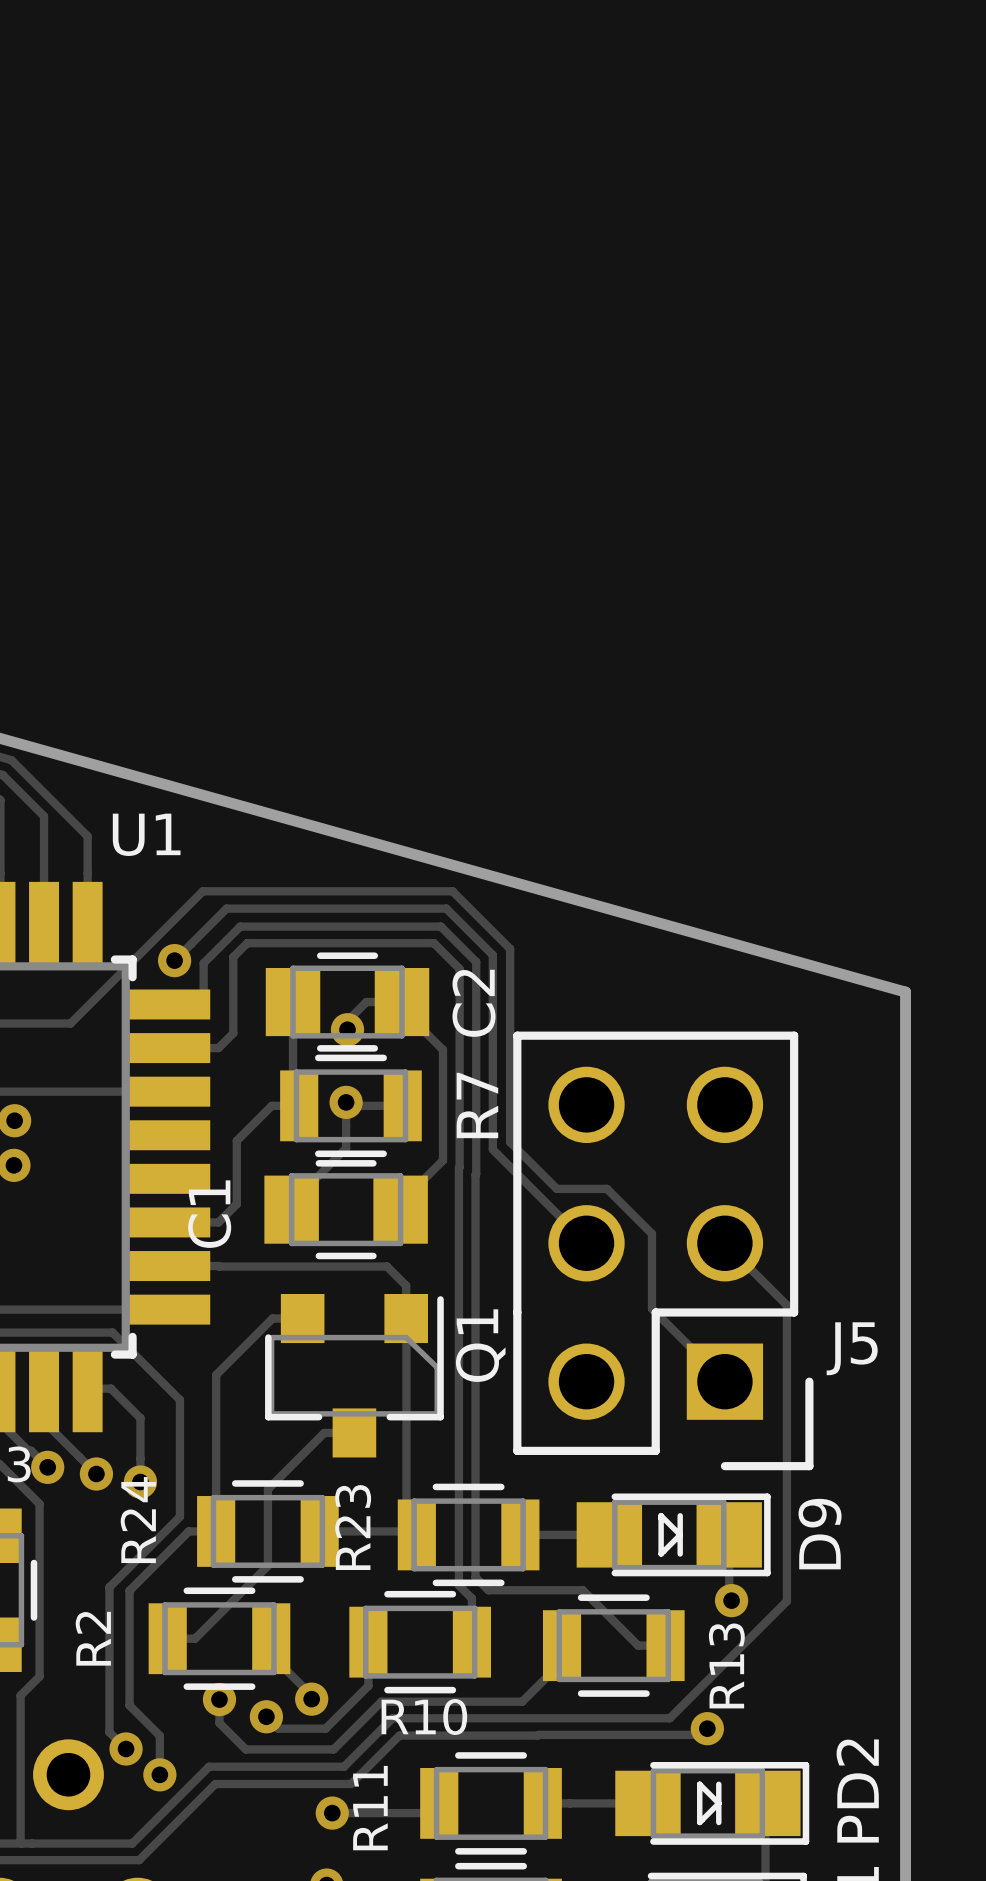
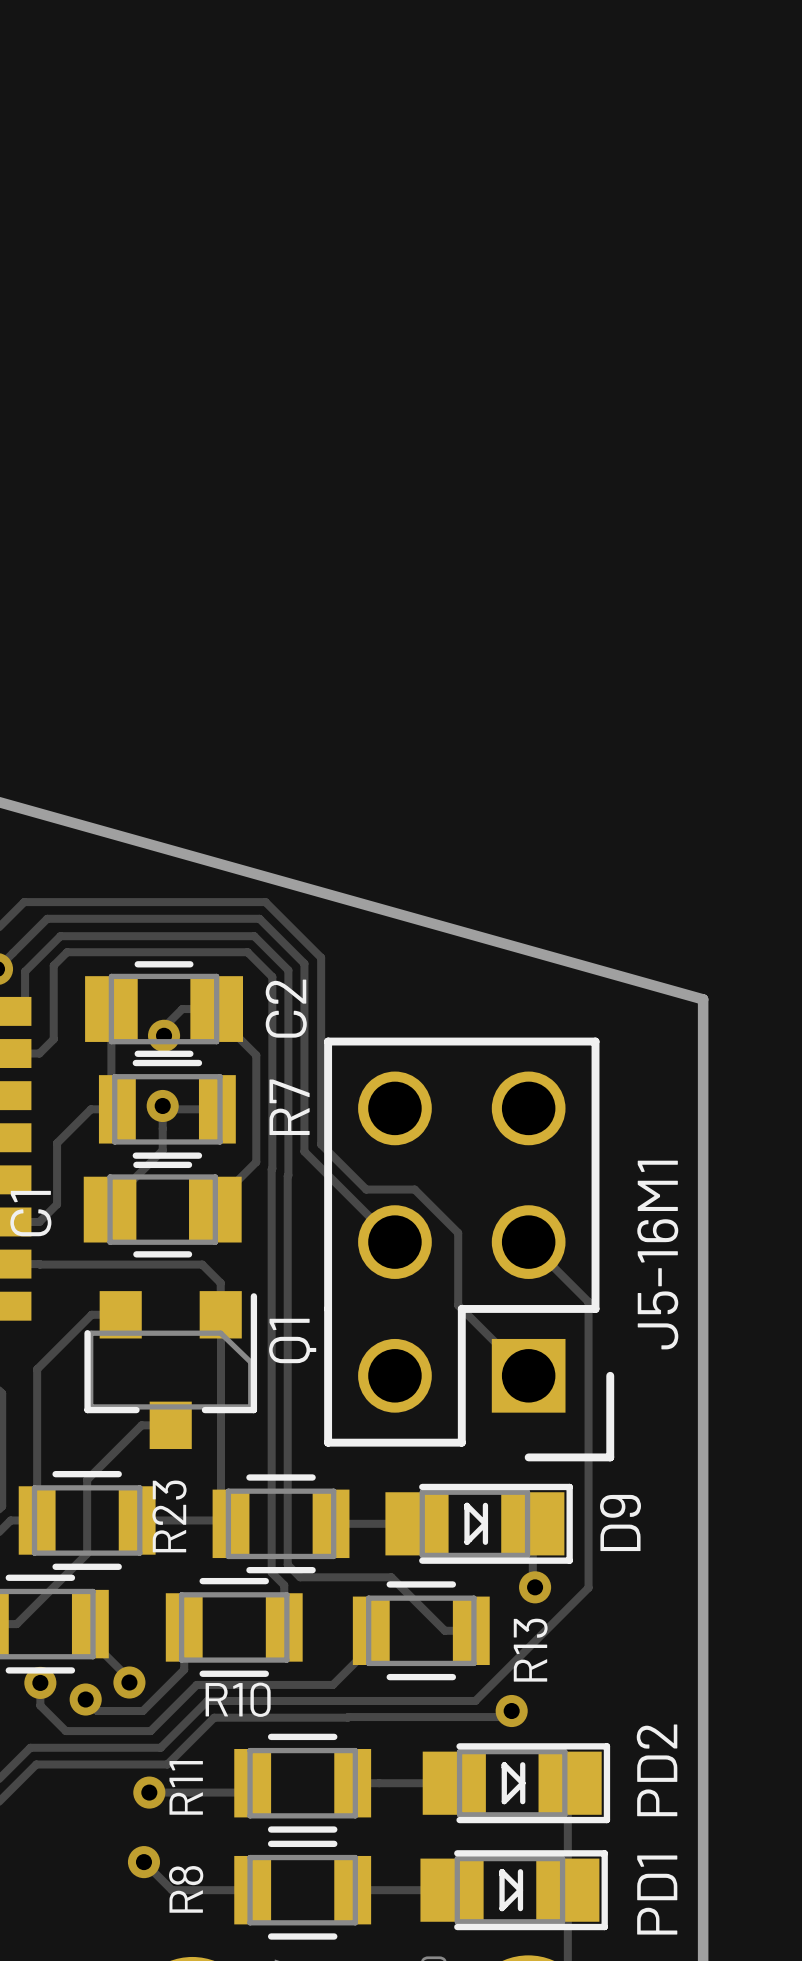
J5 name: J5 (852, 1348) -> J5-16M1 (657, 1255)

